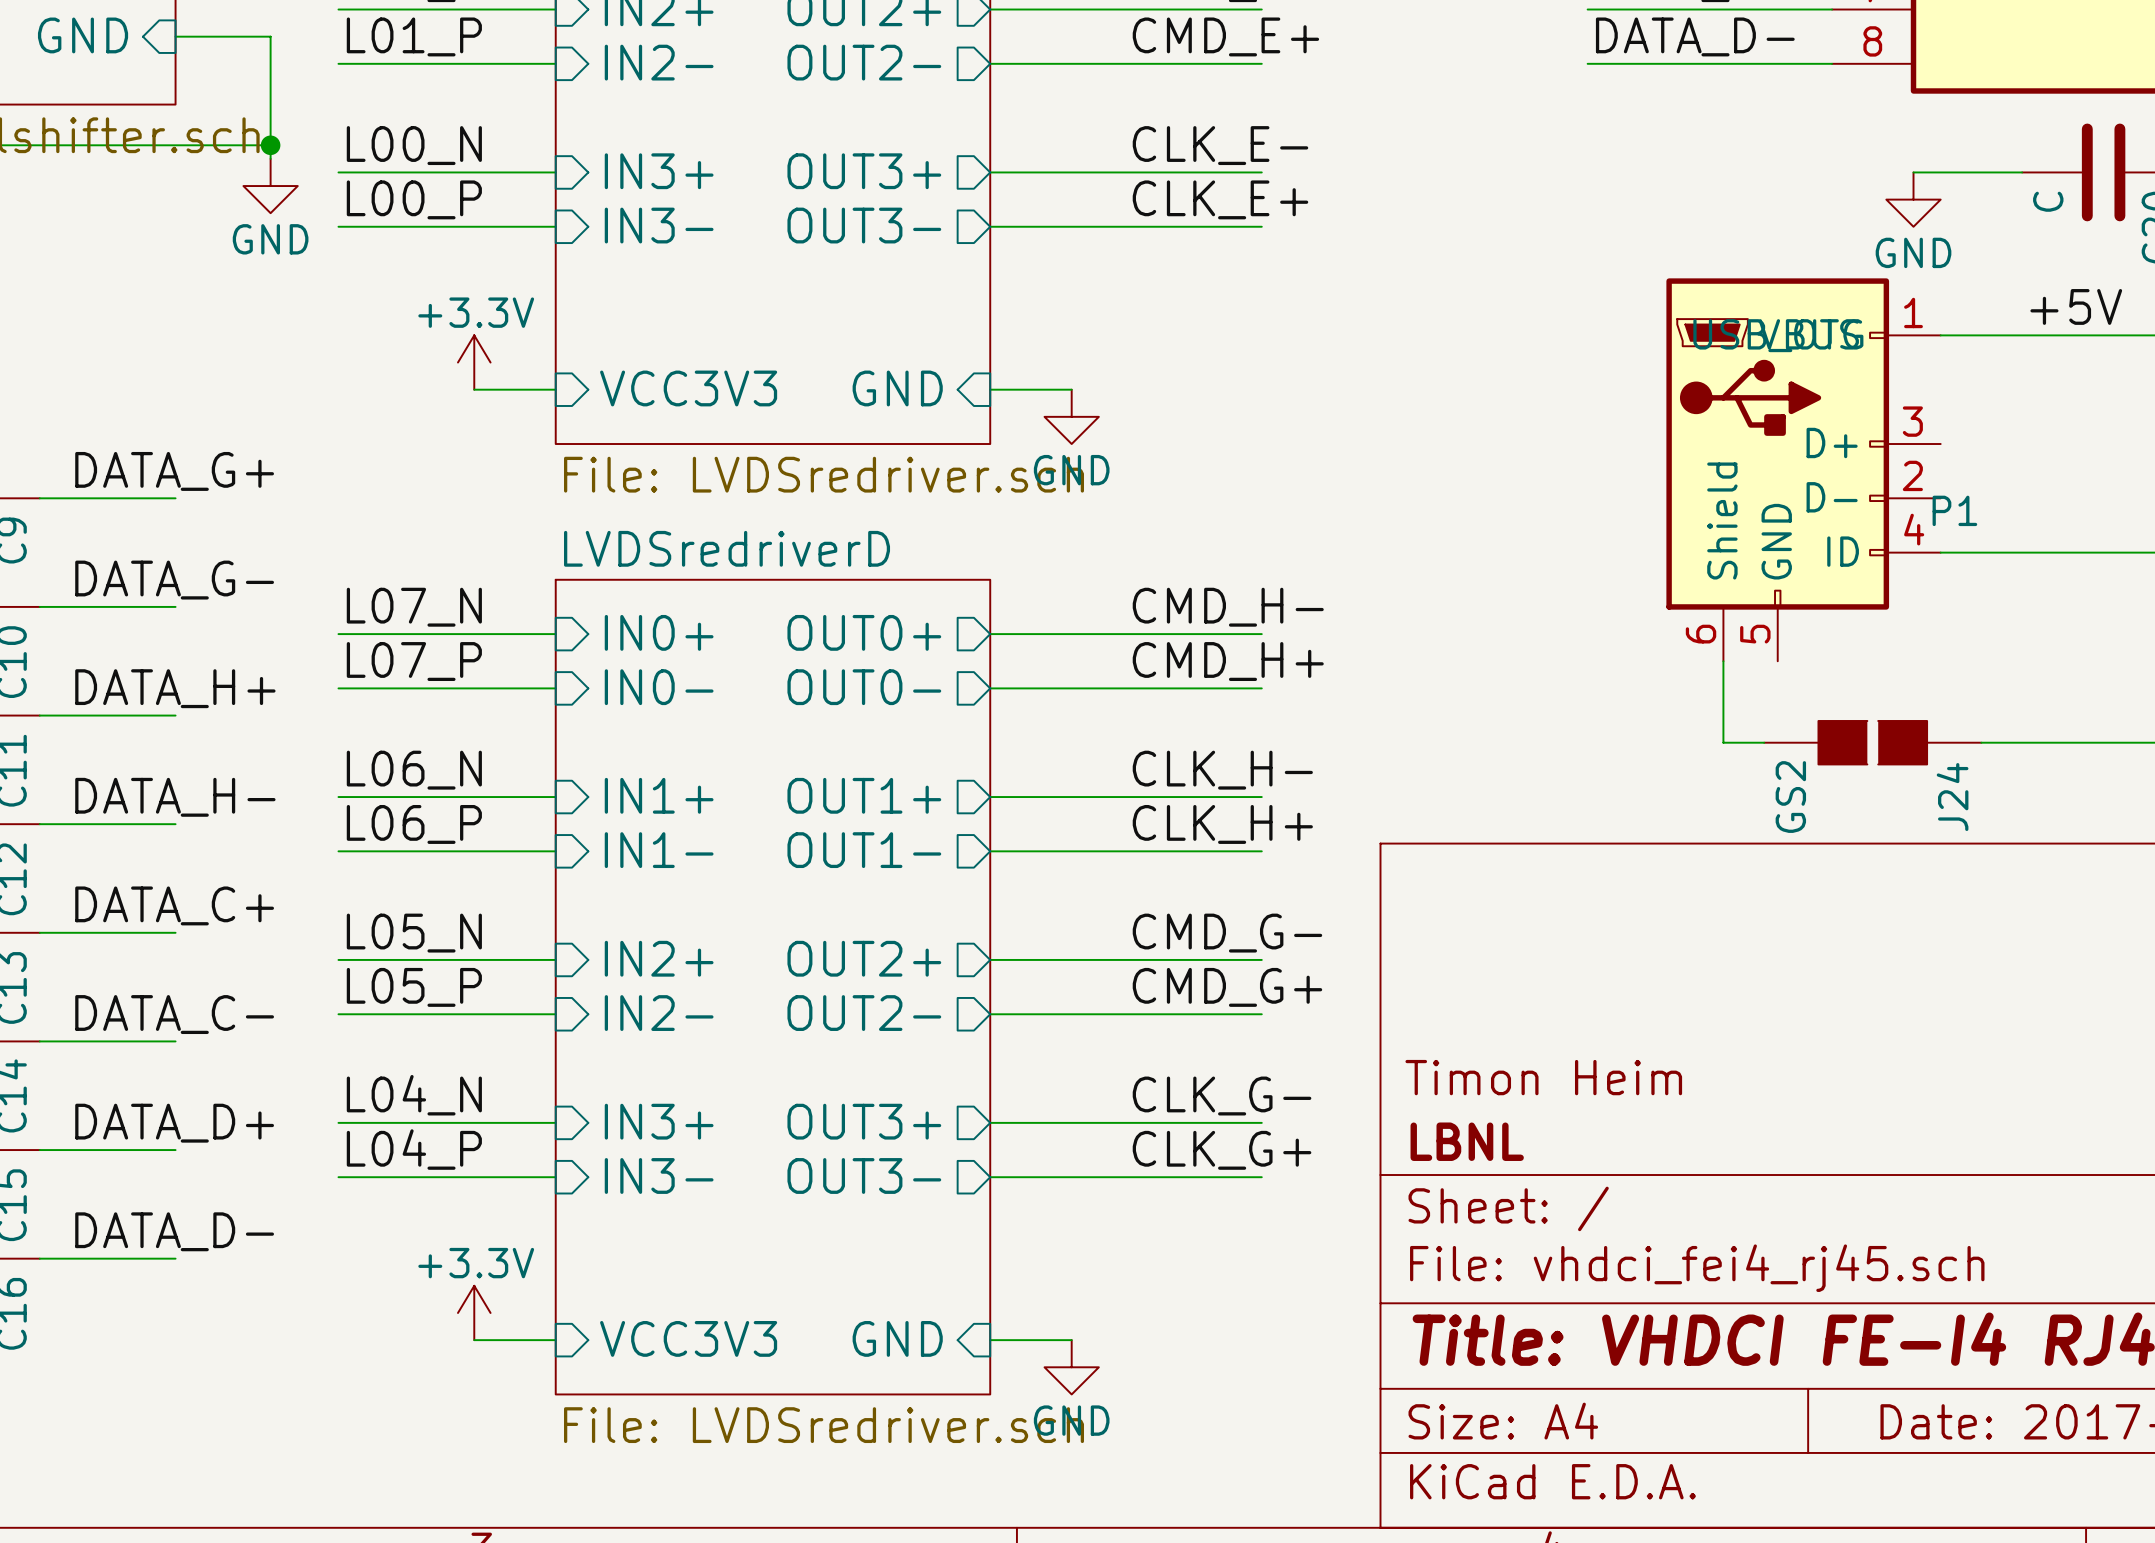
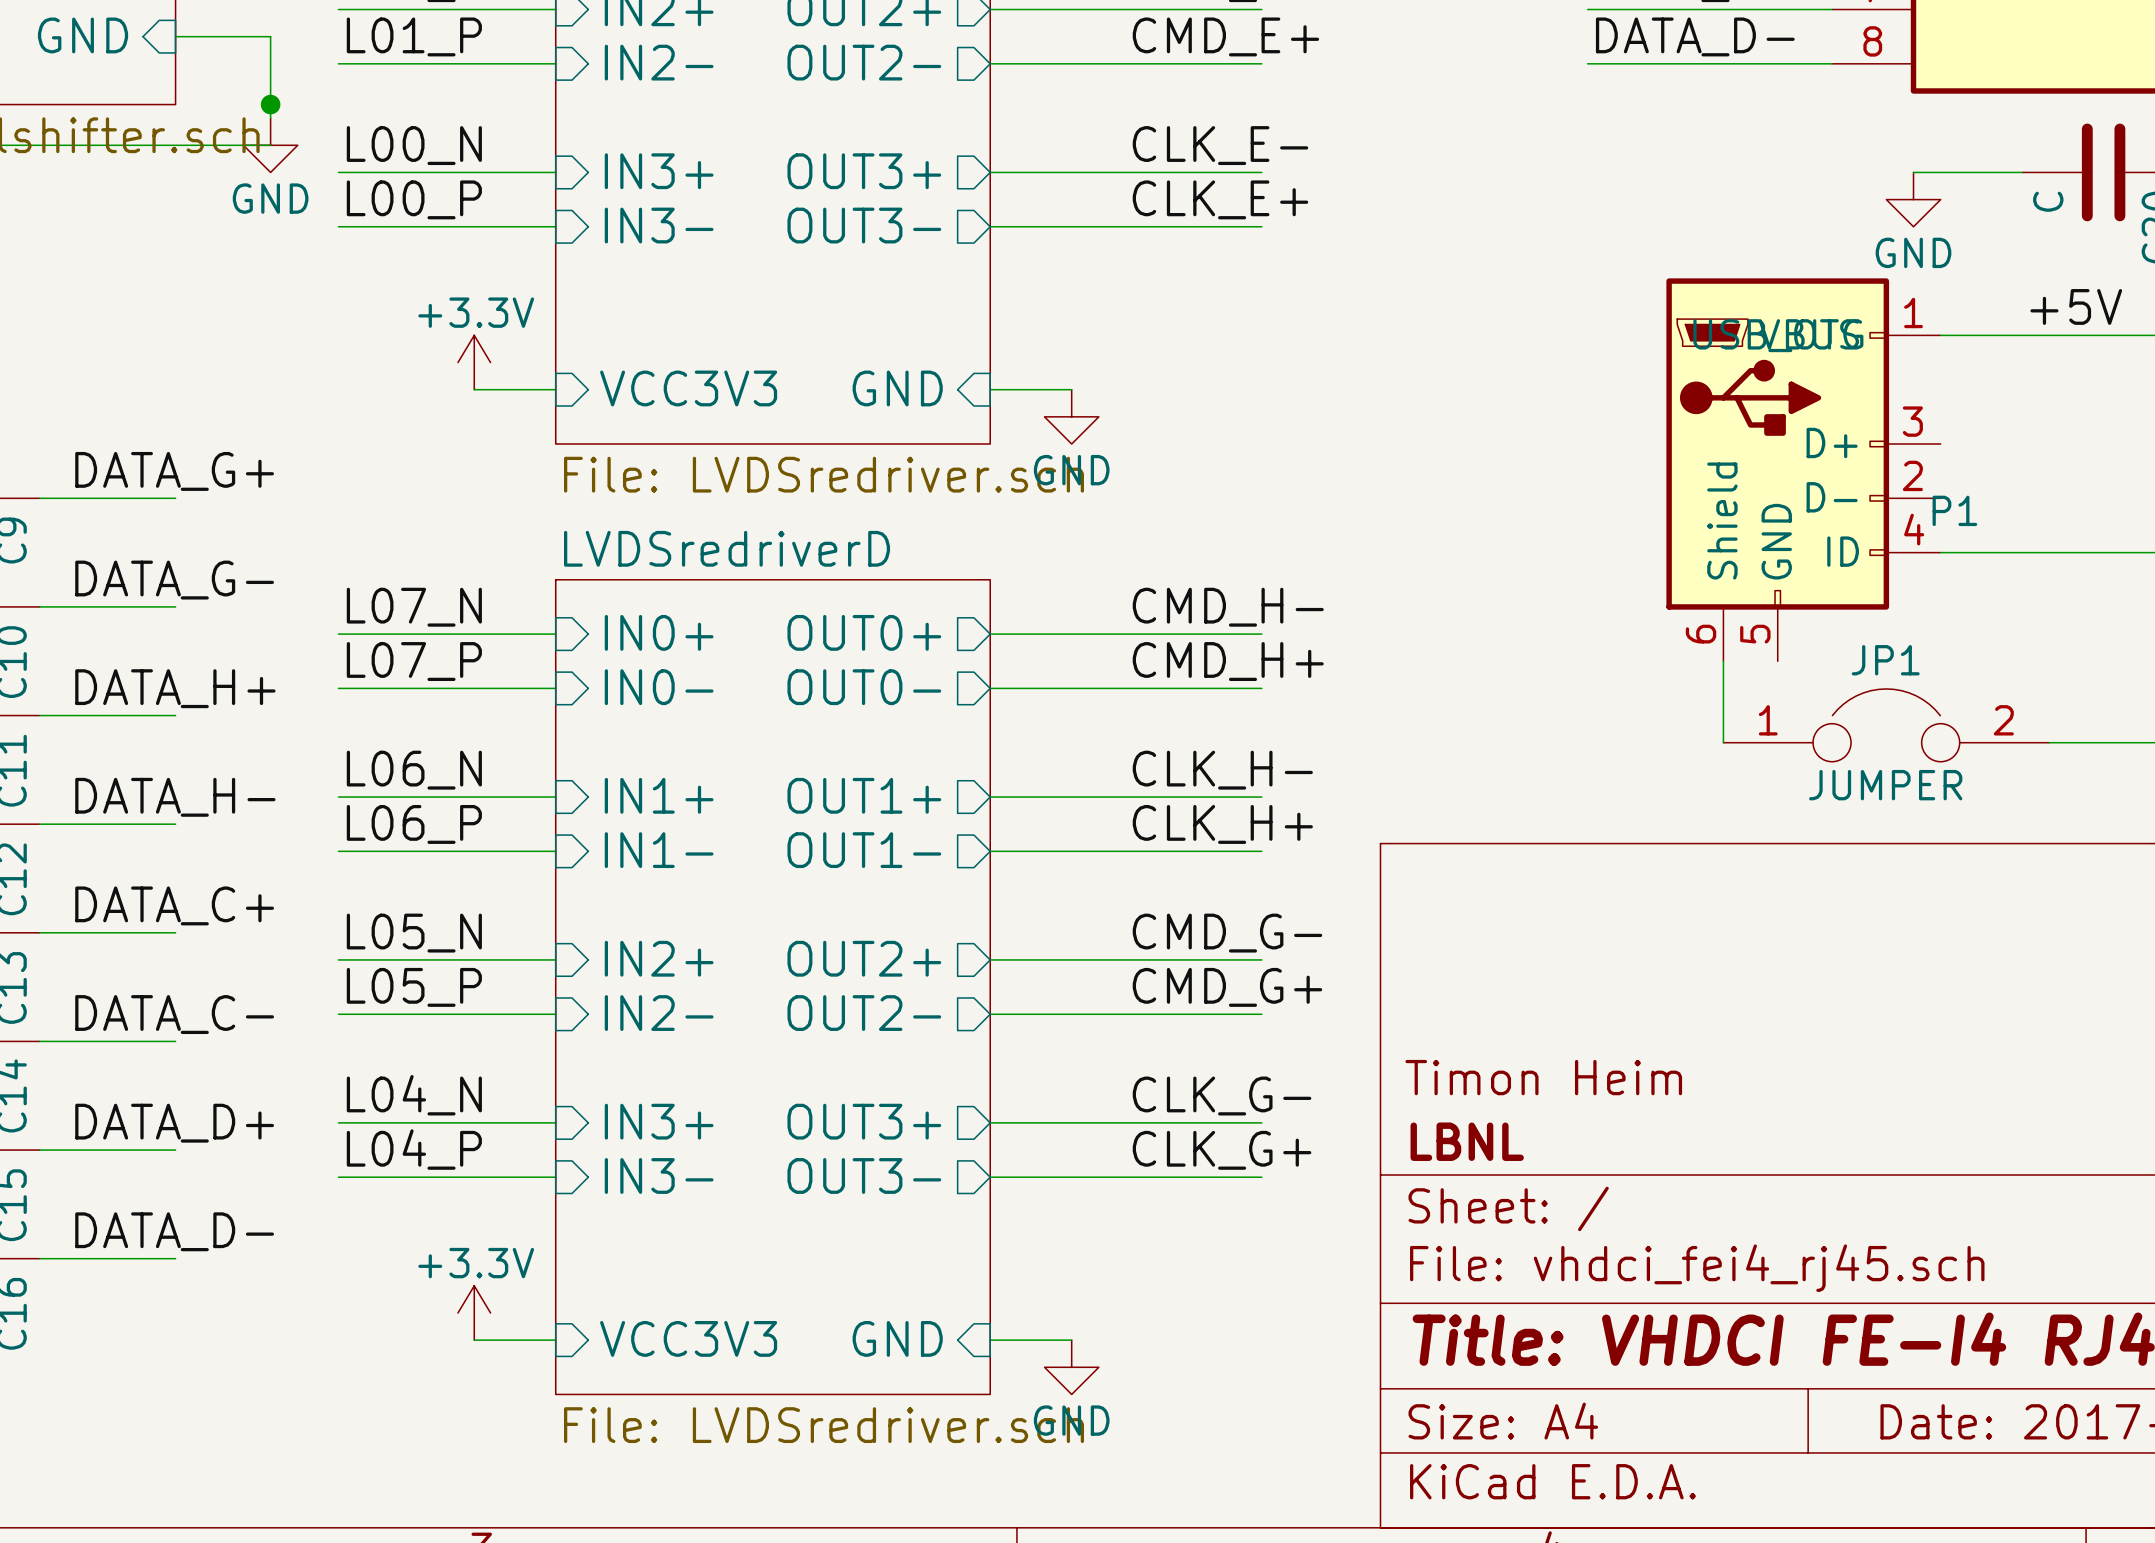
junction position: (270, 145) -> (270, 104)
power symbol position: GND (270, 186) -> GND (270, 145)
JP1: none -> JUMPER (1886, 725)
J24: GS2 (1872, 742) -> none

